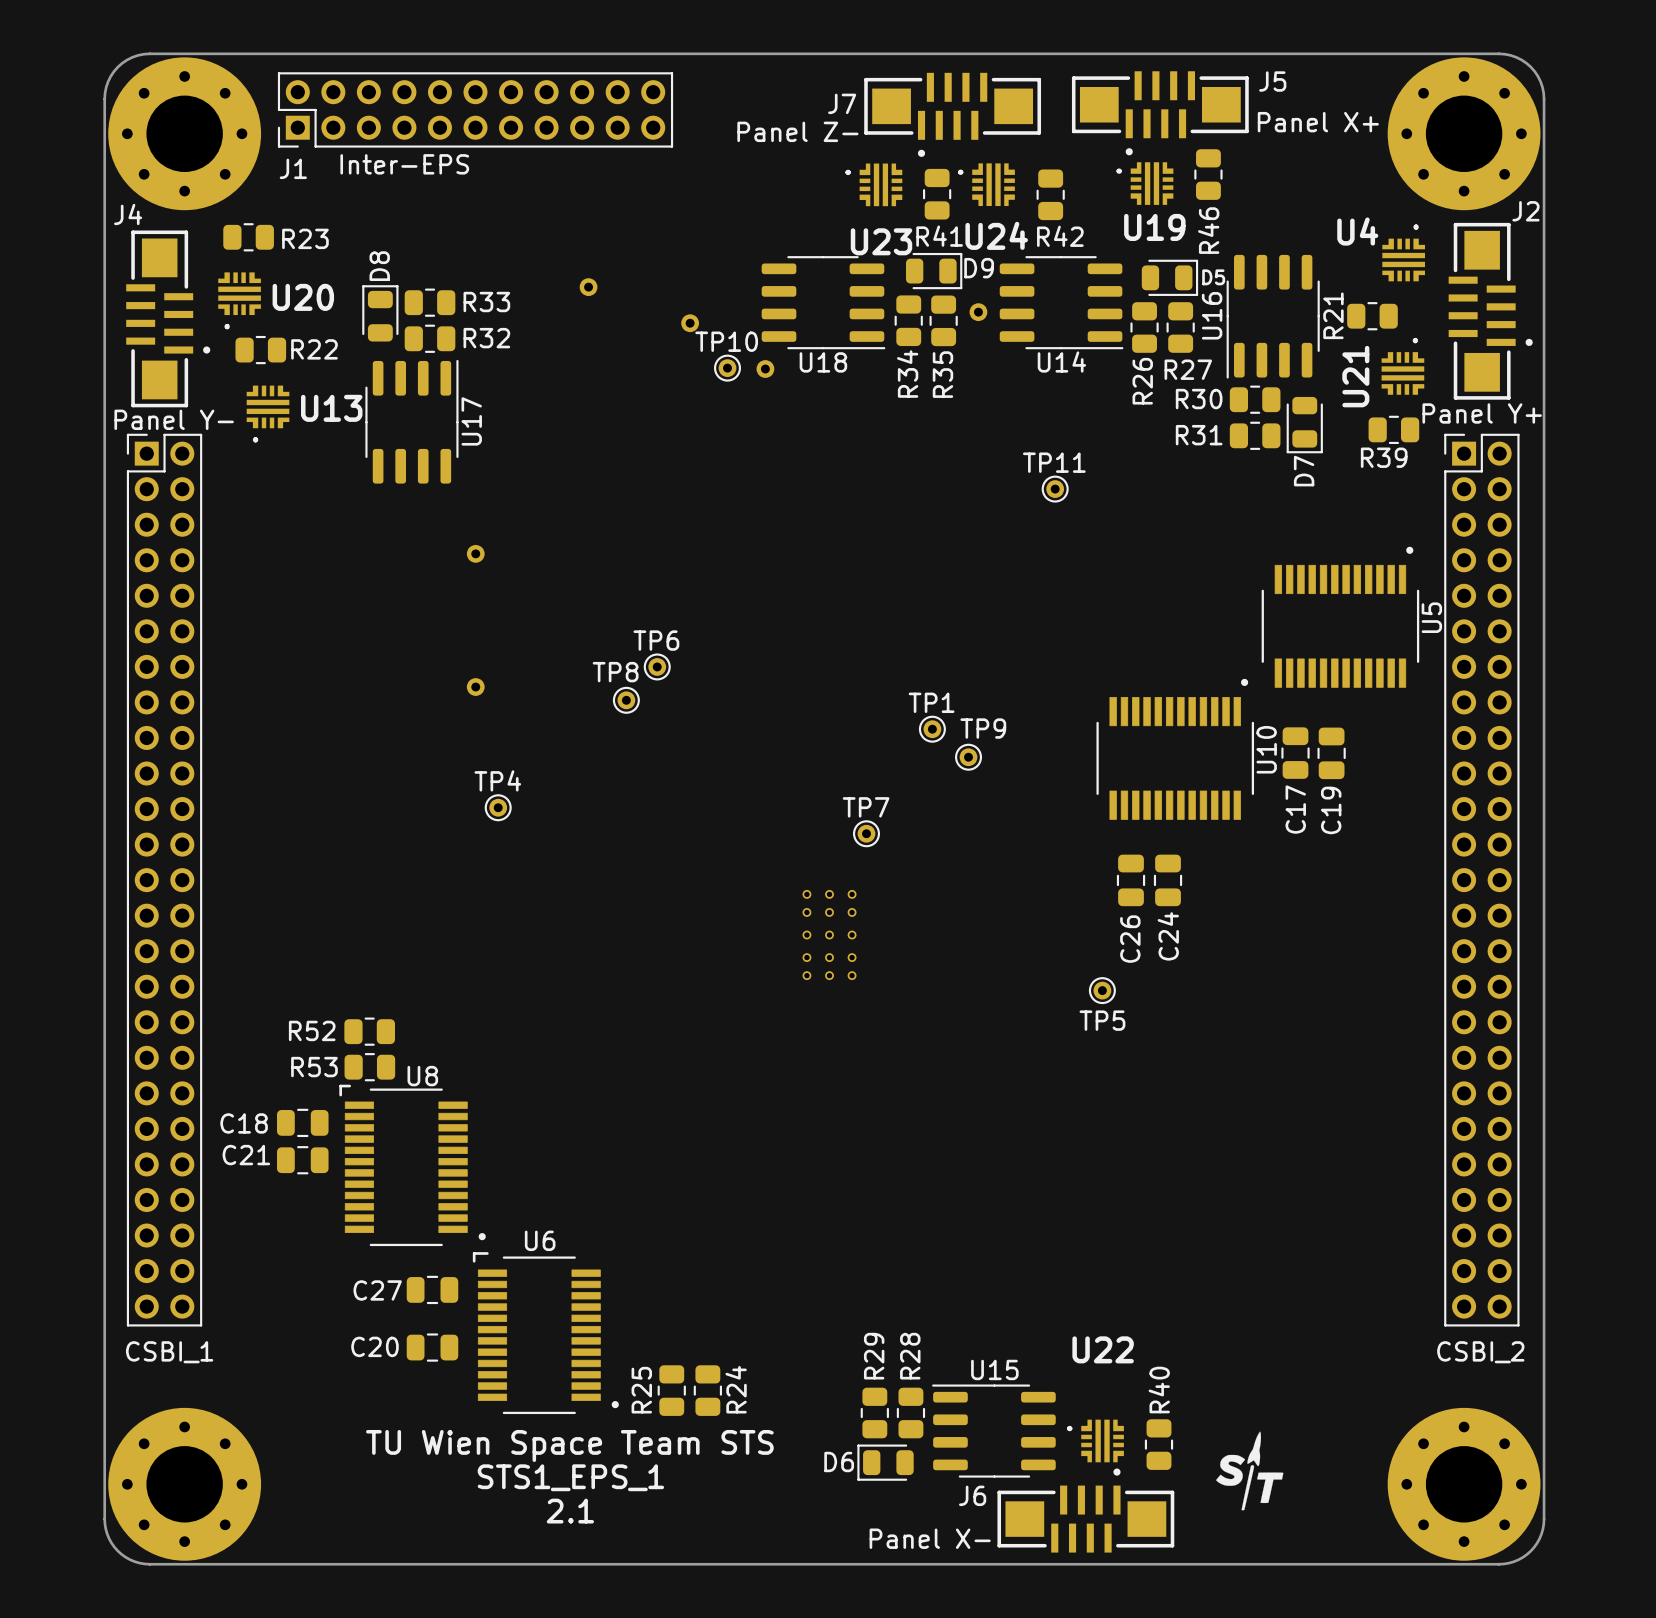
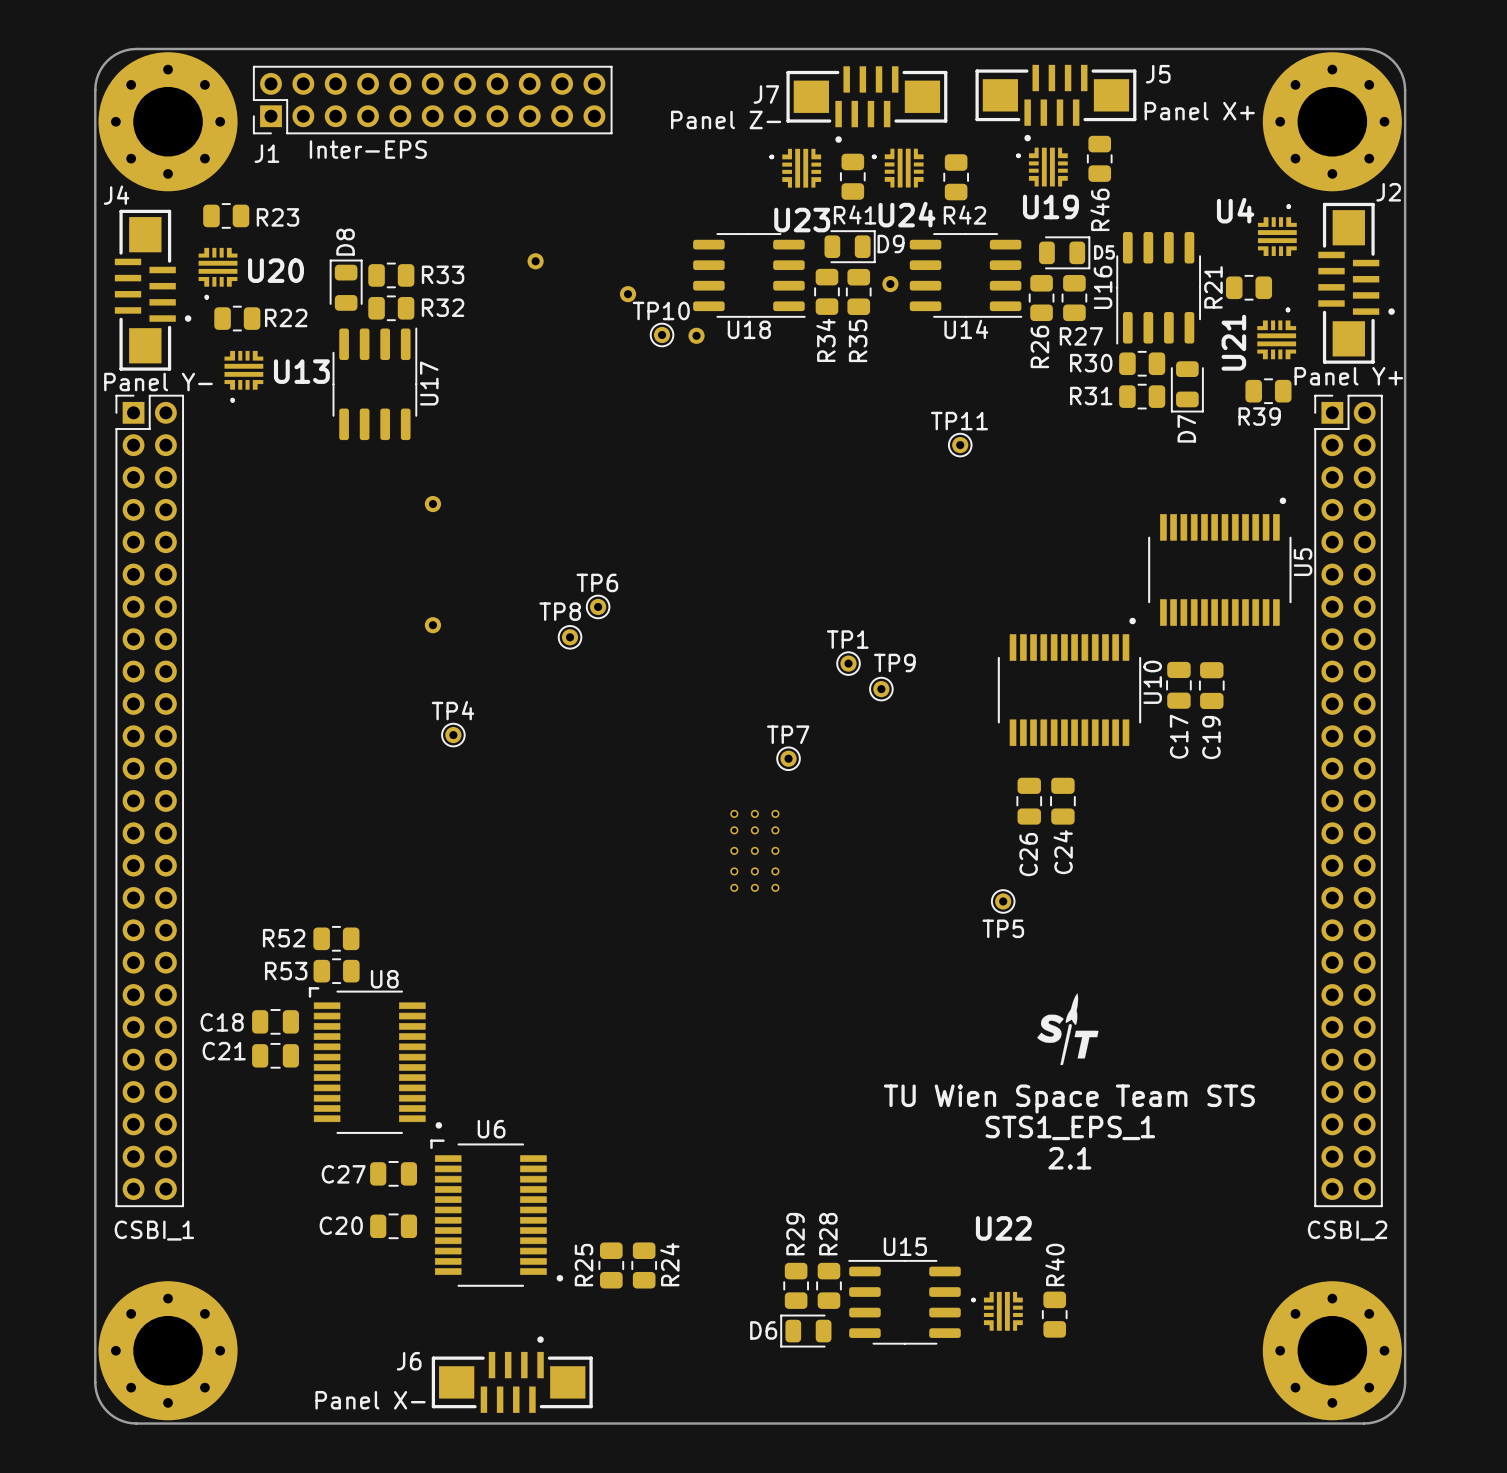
text: none -> TU Wien Space Team STS (1069, 1099)
text: none -> STS1_EPS_1 (1070, 1127)
text: none -> 2.1 (1069, 1158)
text: TU Wien Space Team STS (569, 1445) -> none
drawing position: (1249, 1470) -> (1067, 1029)
text: STS1_EPS_1 (570, 1477) -> none
J6 position: (1085, 1510) -> (512, 1374)
text: 2.1 (570, 1511) -> none

